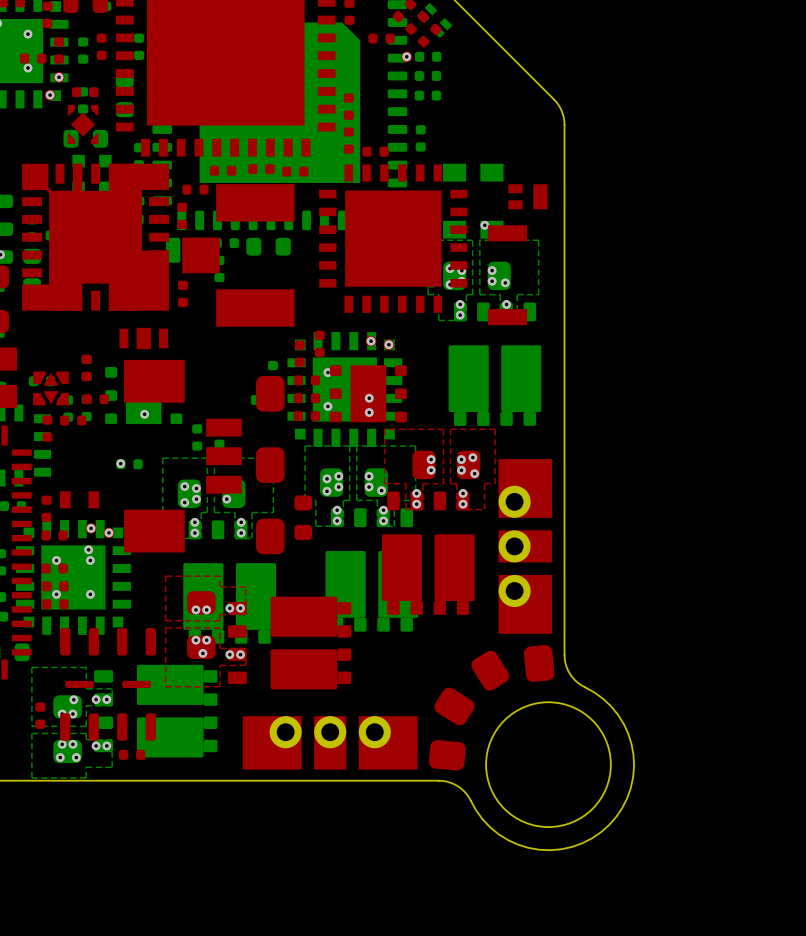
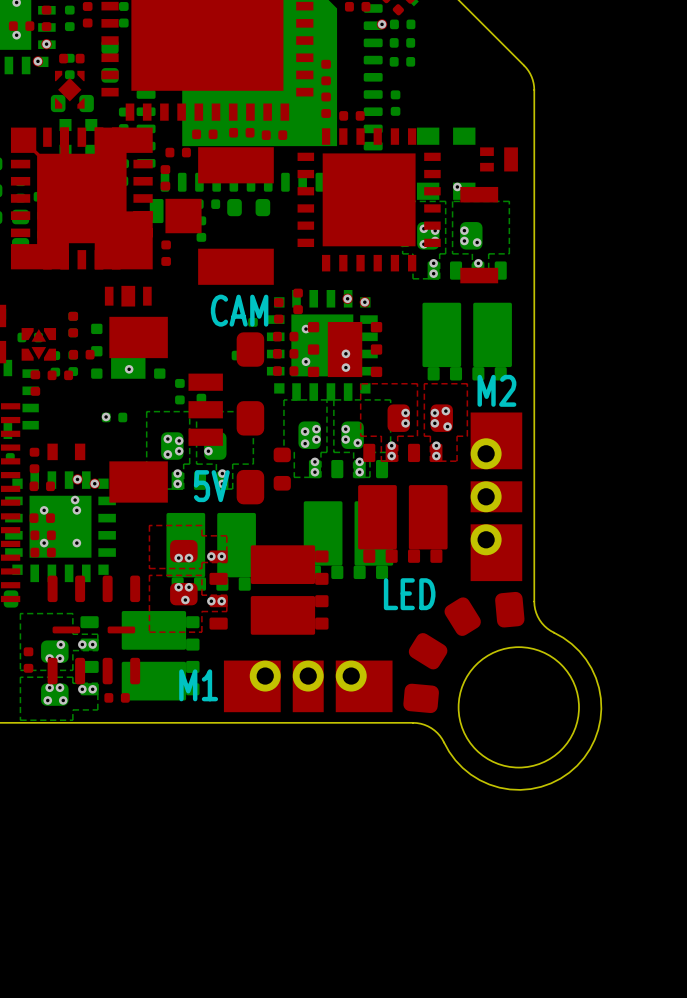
text: none -> CAM (239, 310)
text: none -> M2 (496, 390)
text: none -> 5V (211, 486)
text: none -> LED (409, 594)
text: none -> M1 (198, 685)

